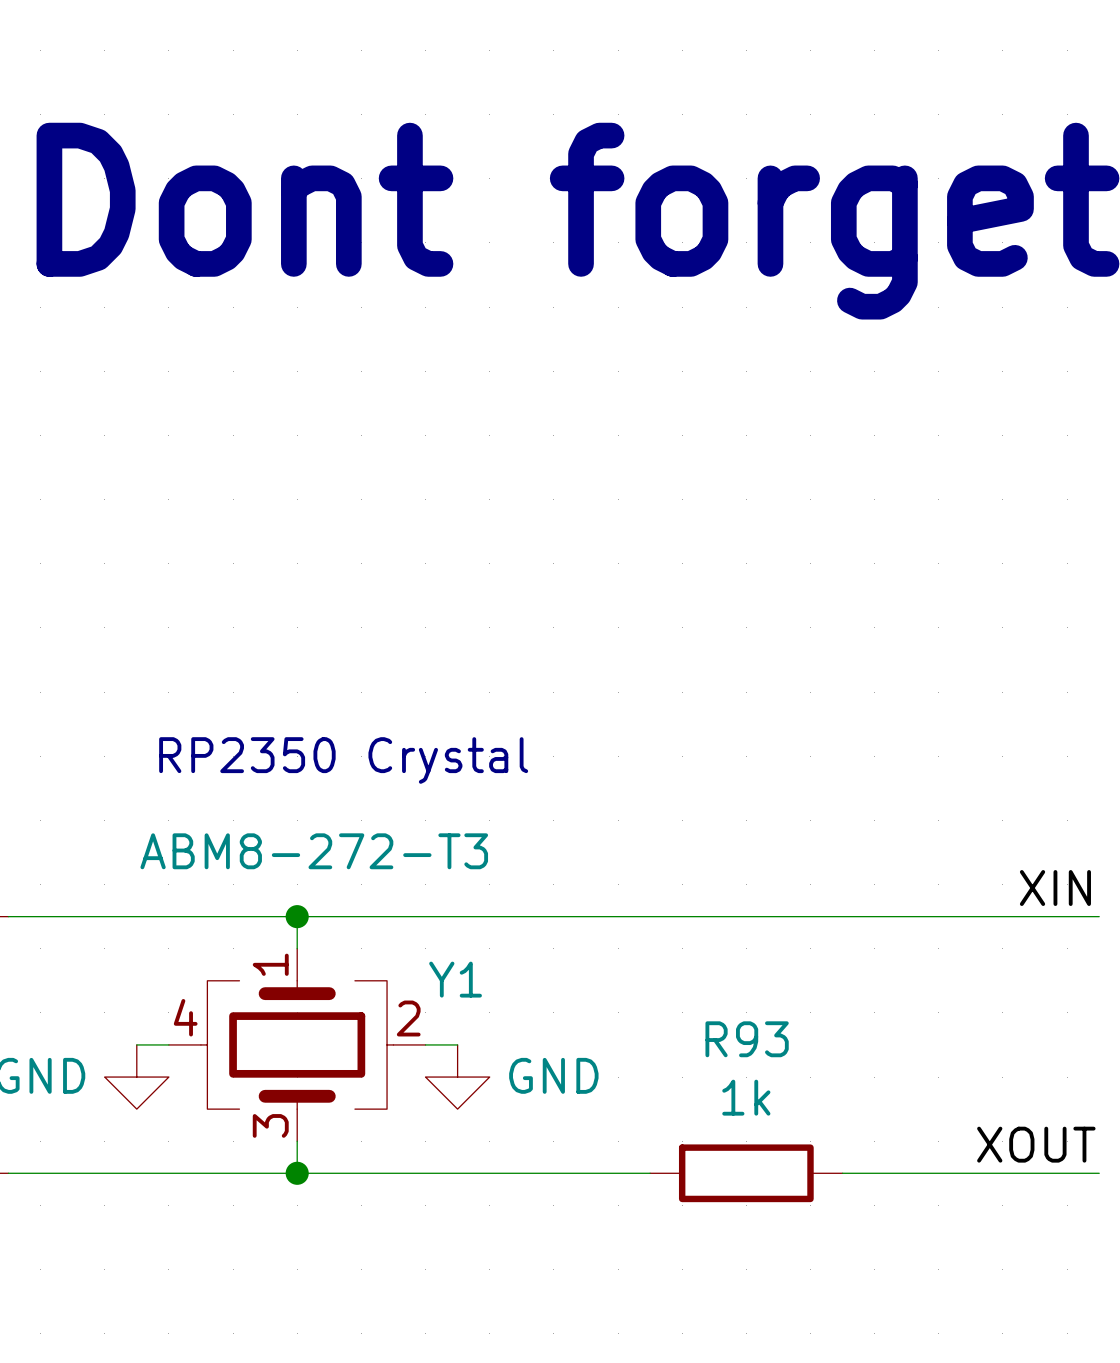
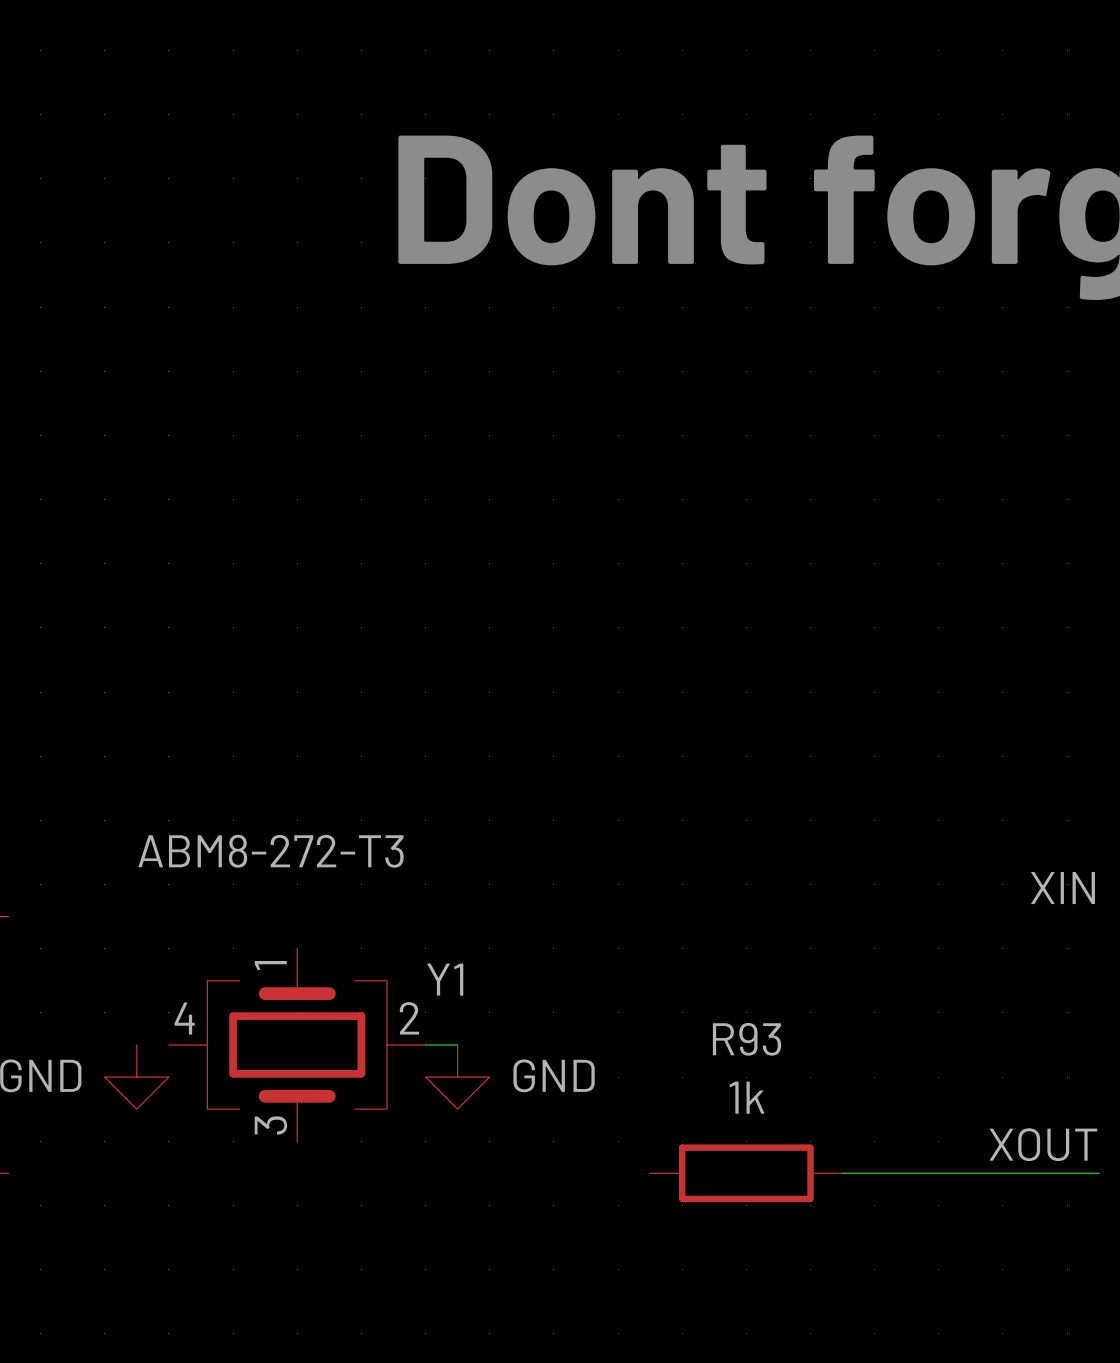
text: RP2350 Crystal (343, 760) -> none
wire: (8, 916) (1099, 916) -> none
wire: (297, 916) (297, 948) -> none
junction: (297, 916) -> none
wire: (136, 1044) (168, 1044) -> none
wire: (297, 1141) (297, 1173) -> none
wire: (8, 1173) (650, 1173) -> none
junction: (297, 1173) -> none

